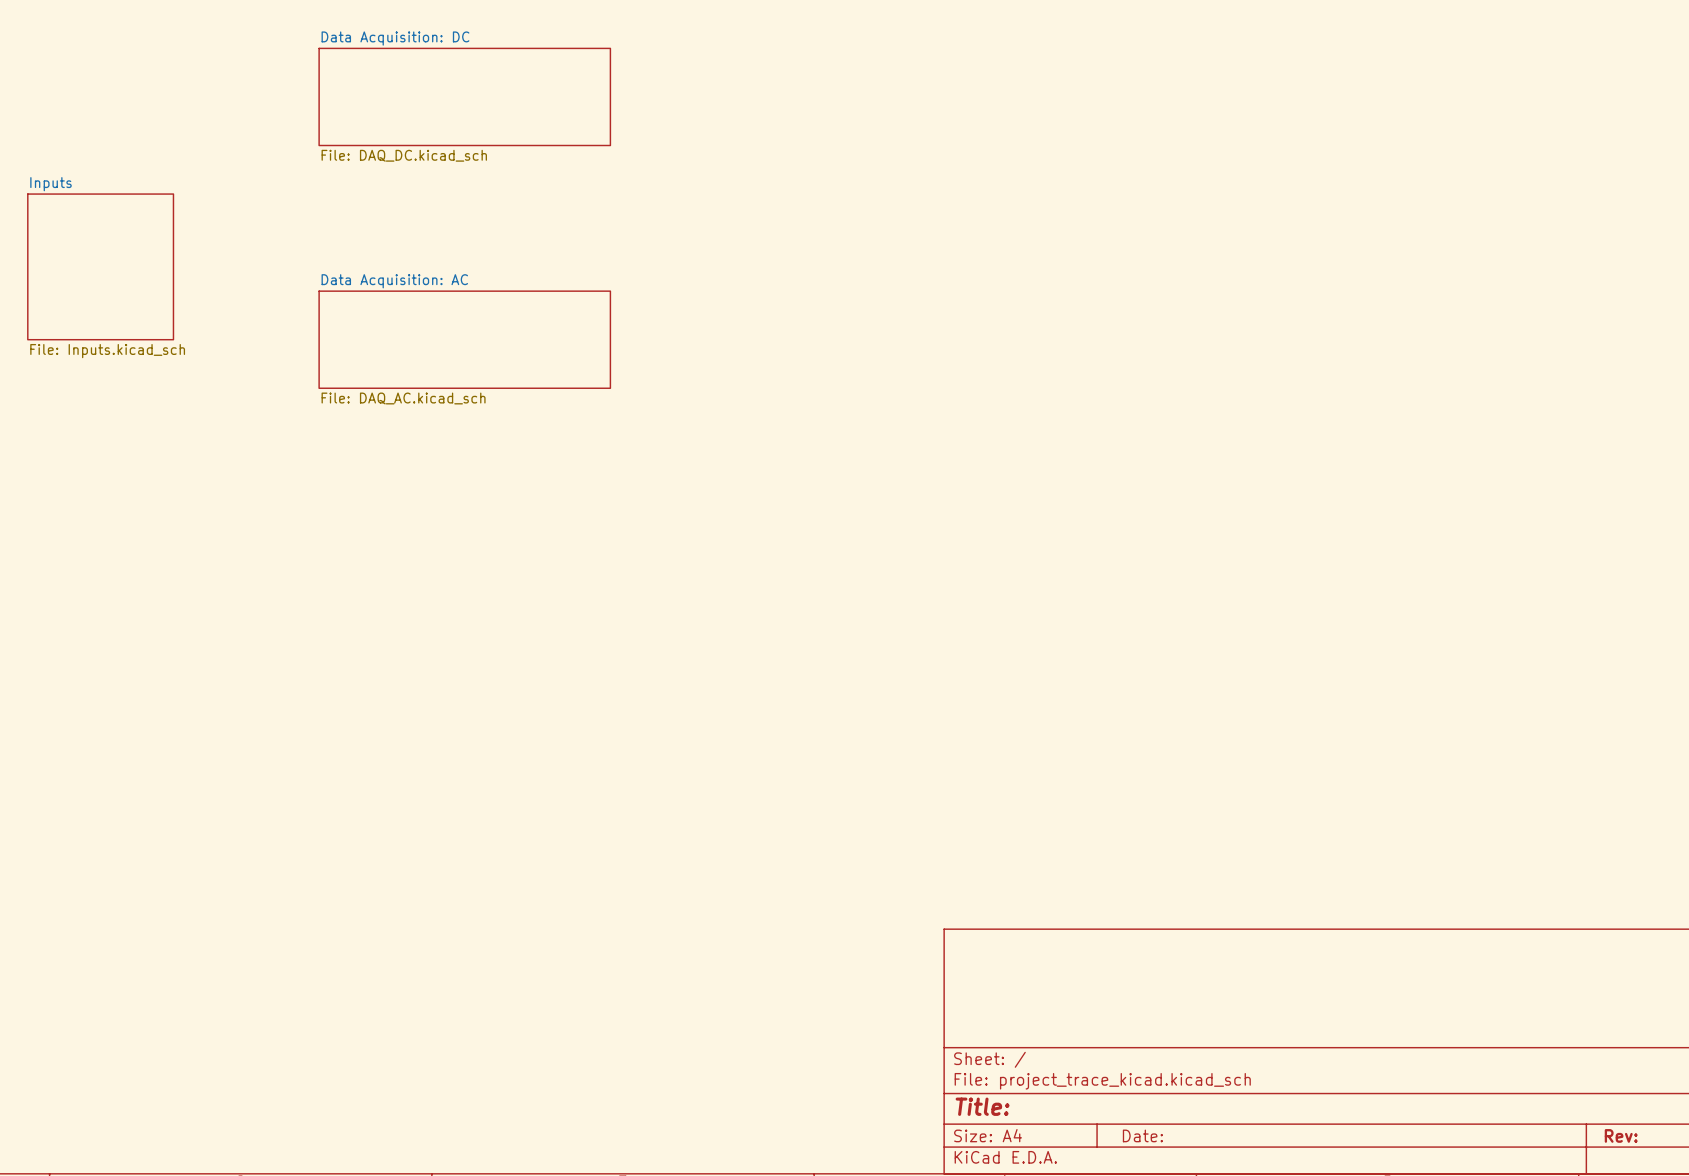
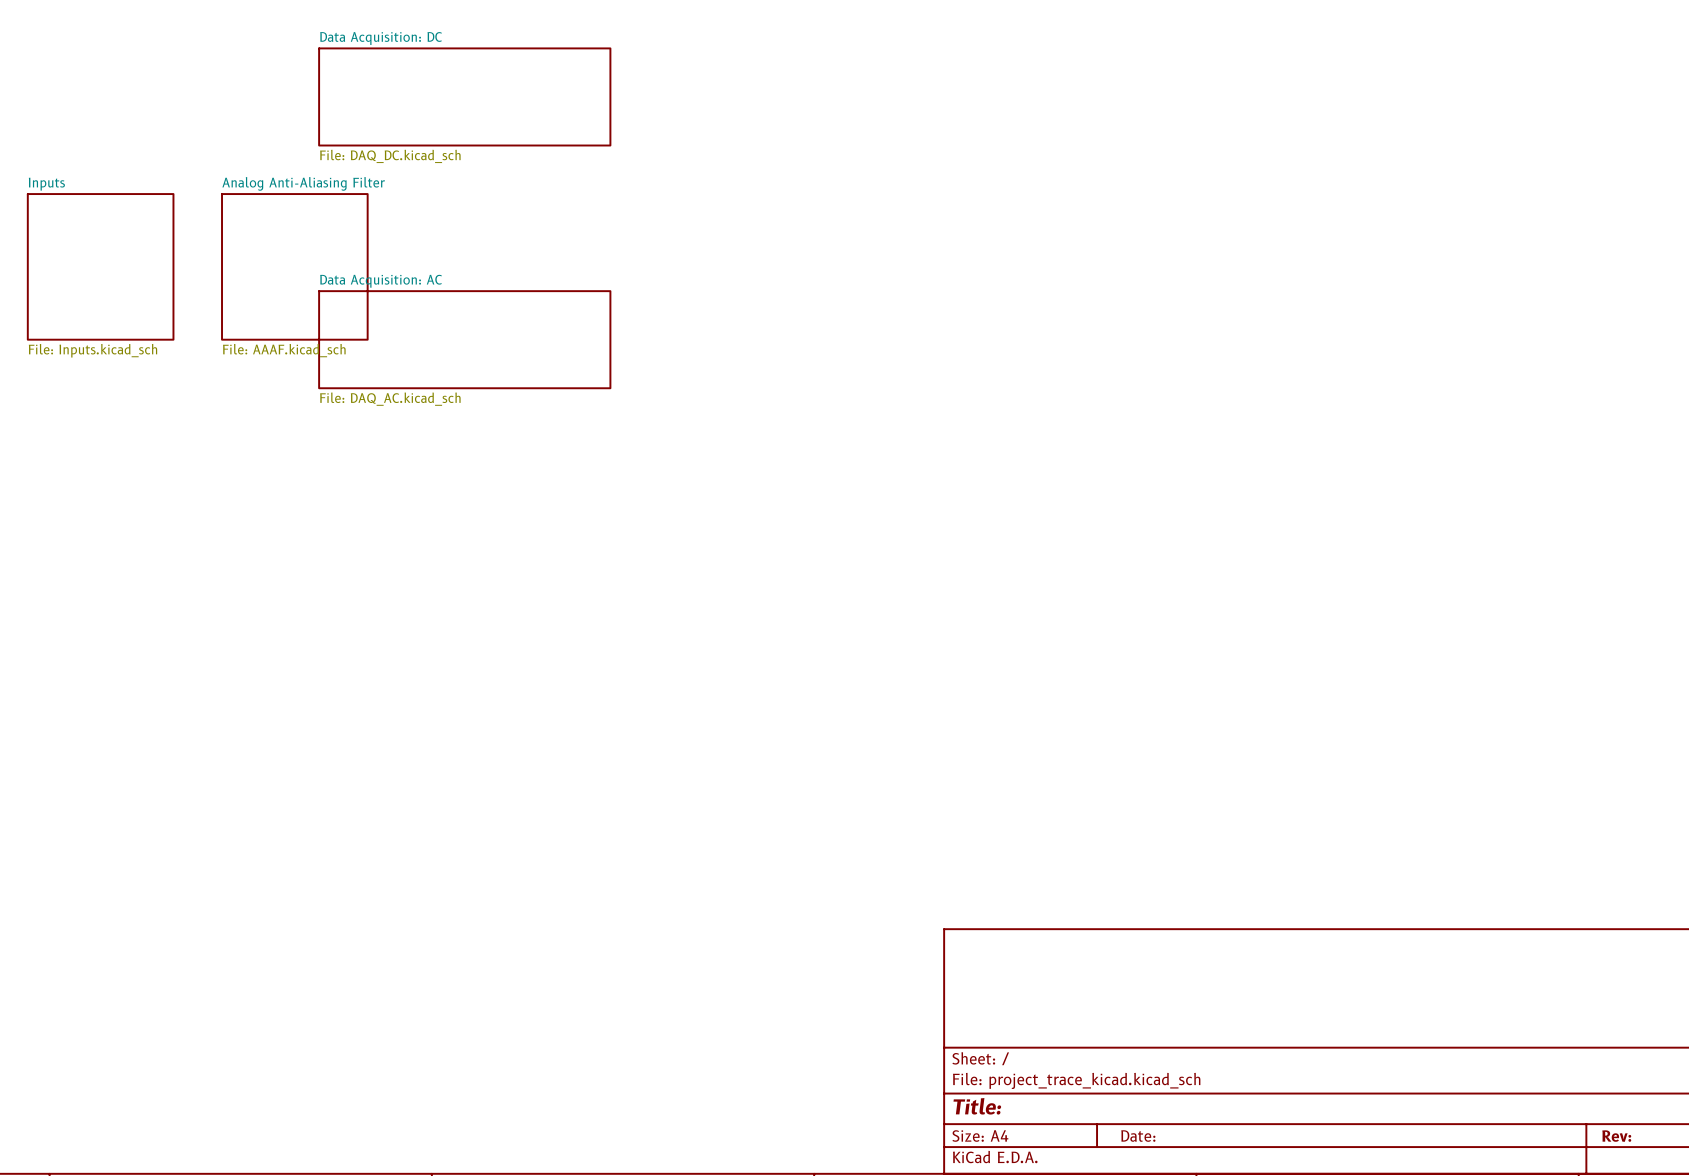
sheet Analog Anti-Aliasing Filter: none -> File: AAAF.kicad_sch (294, 266)

